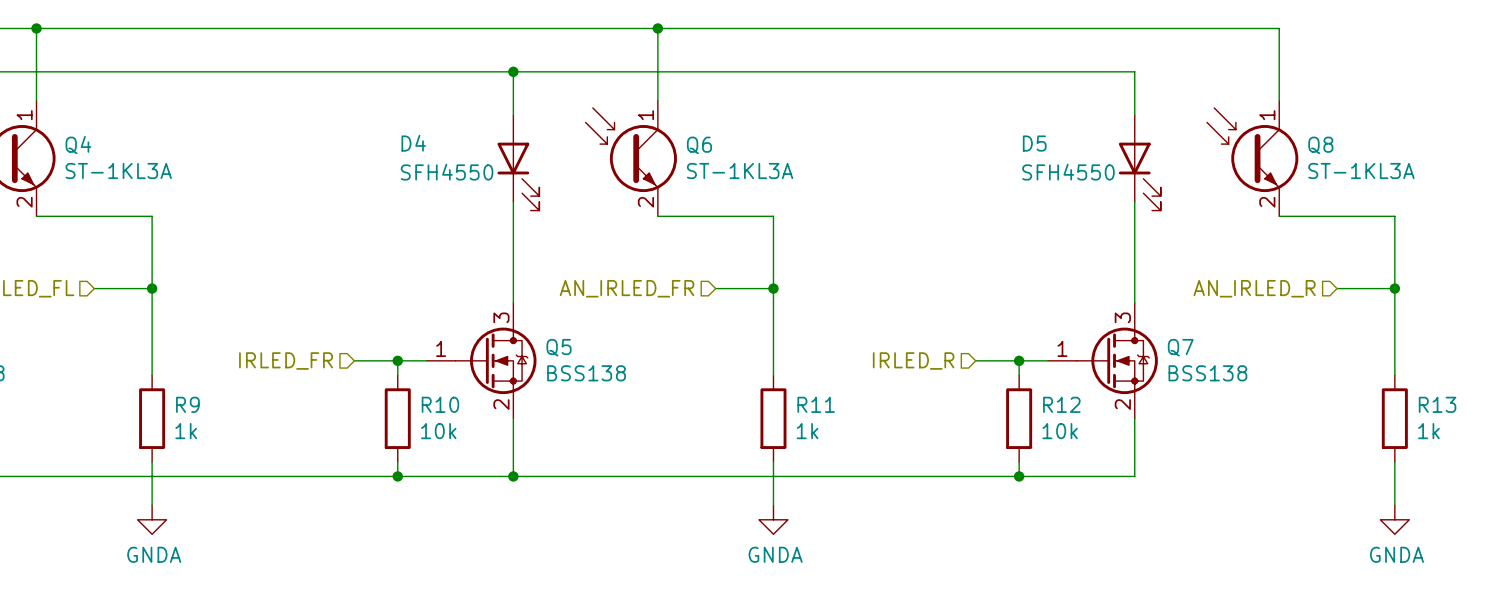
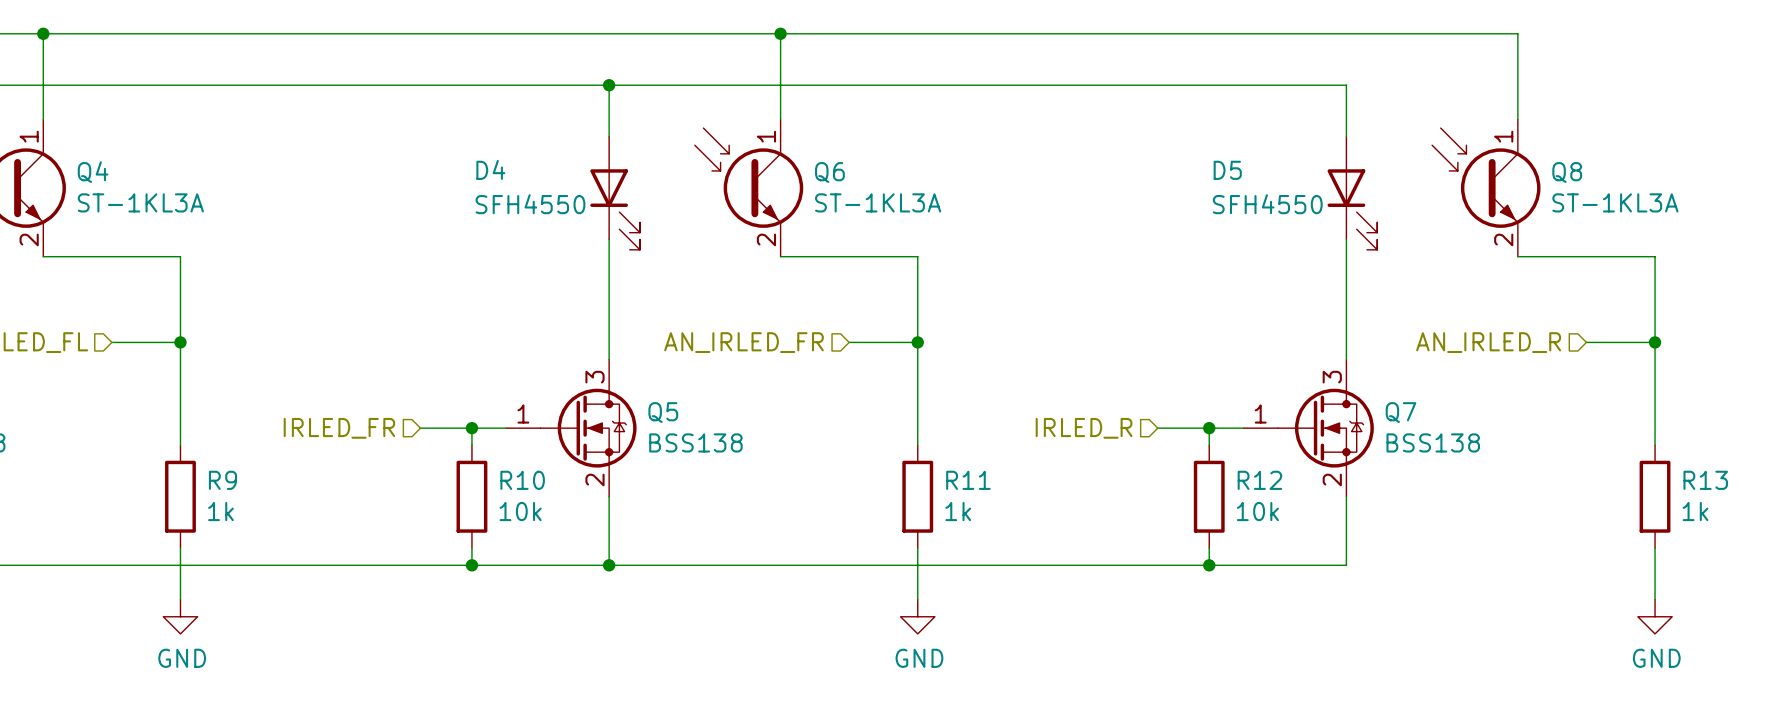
power symbol: GNDA (152, 519) -> GND (180, 616)
power symbol: GNDA (773, 519) -> GND (917, 616)
power symbol: GNDA (1394, 519) -> GND (1655, 616)

